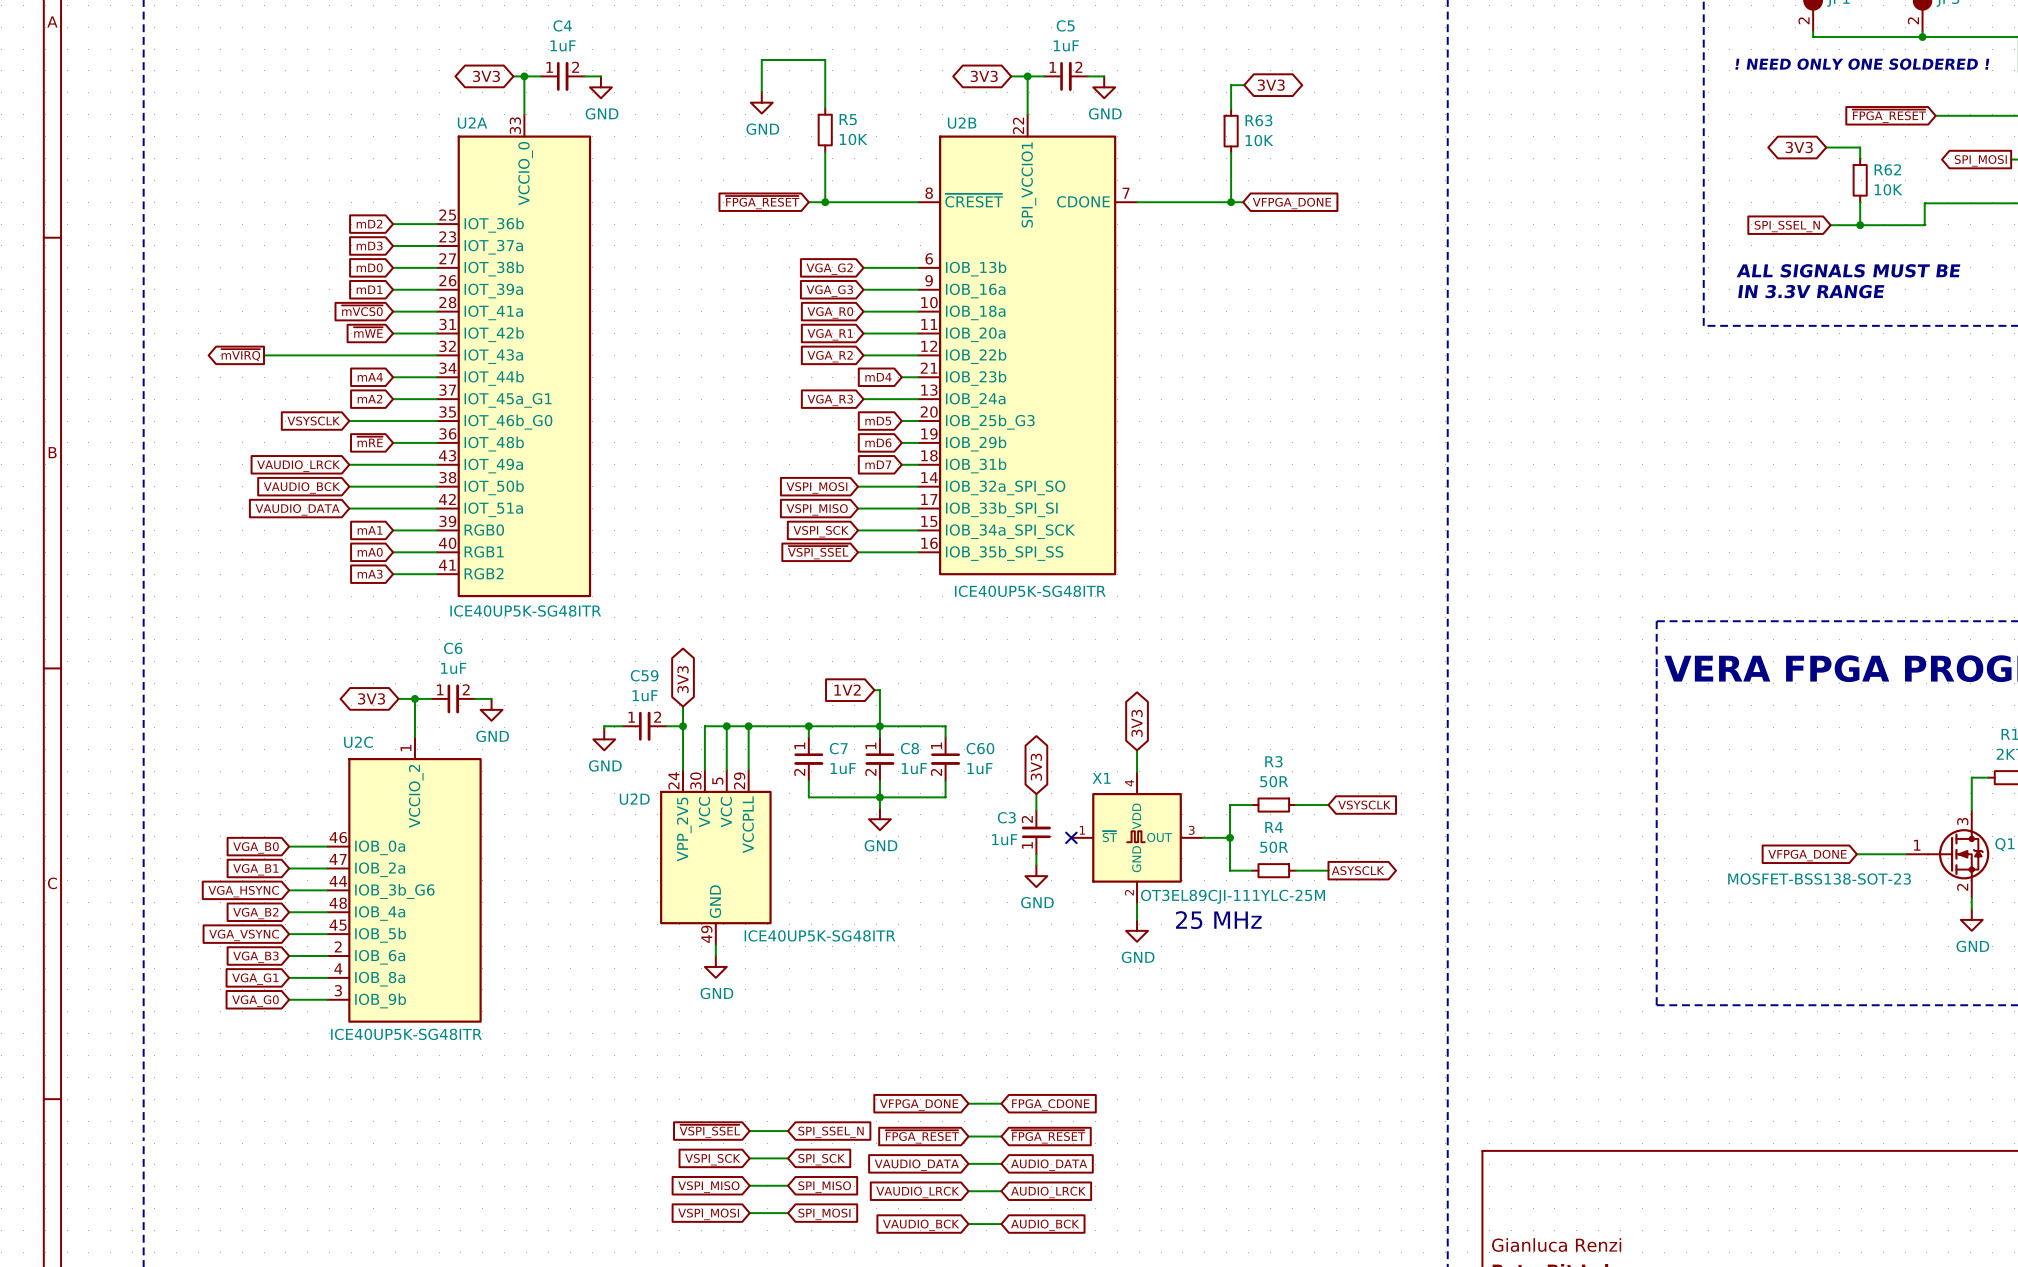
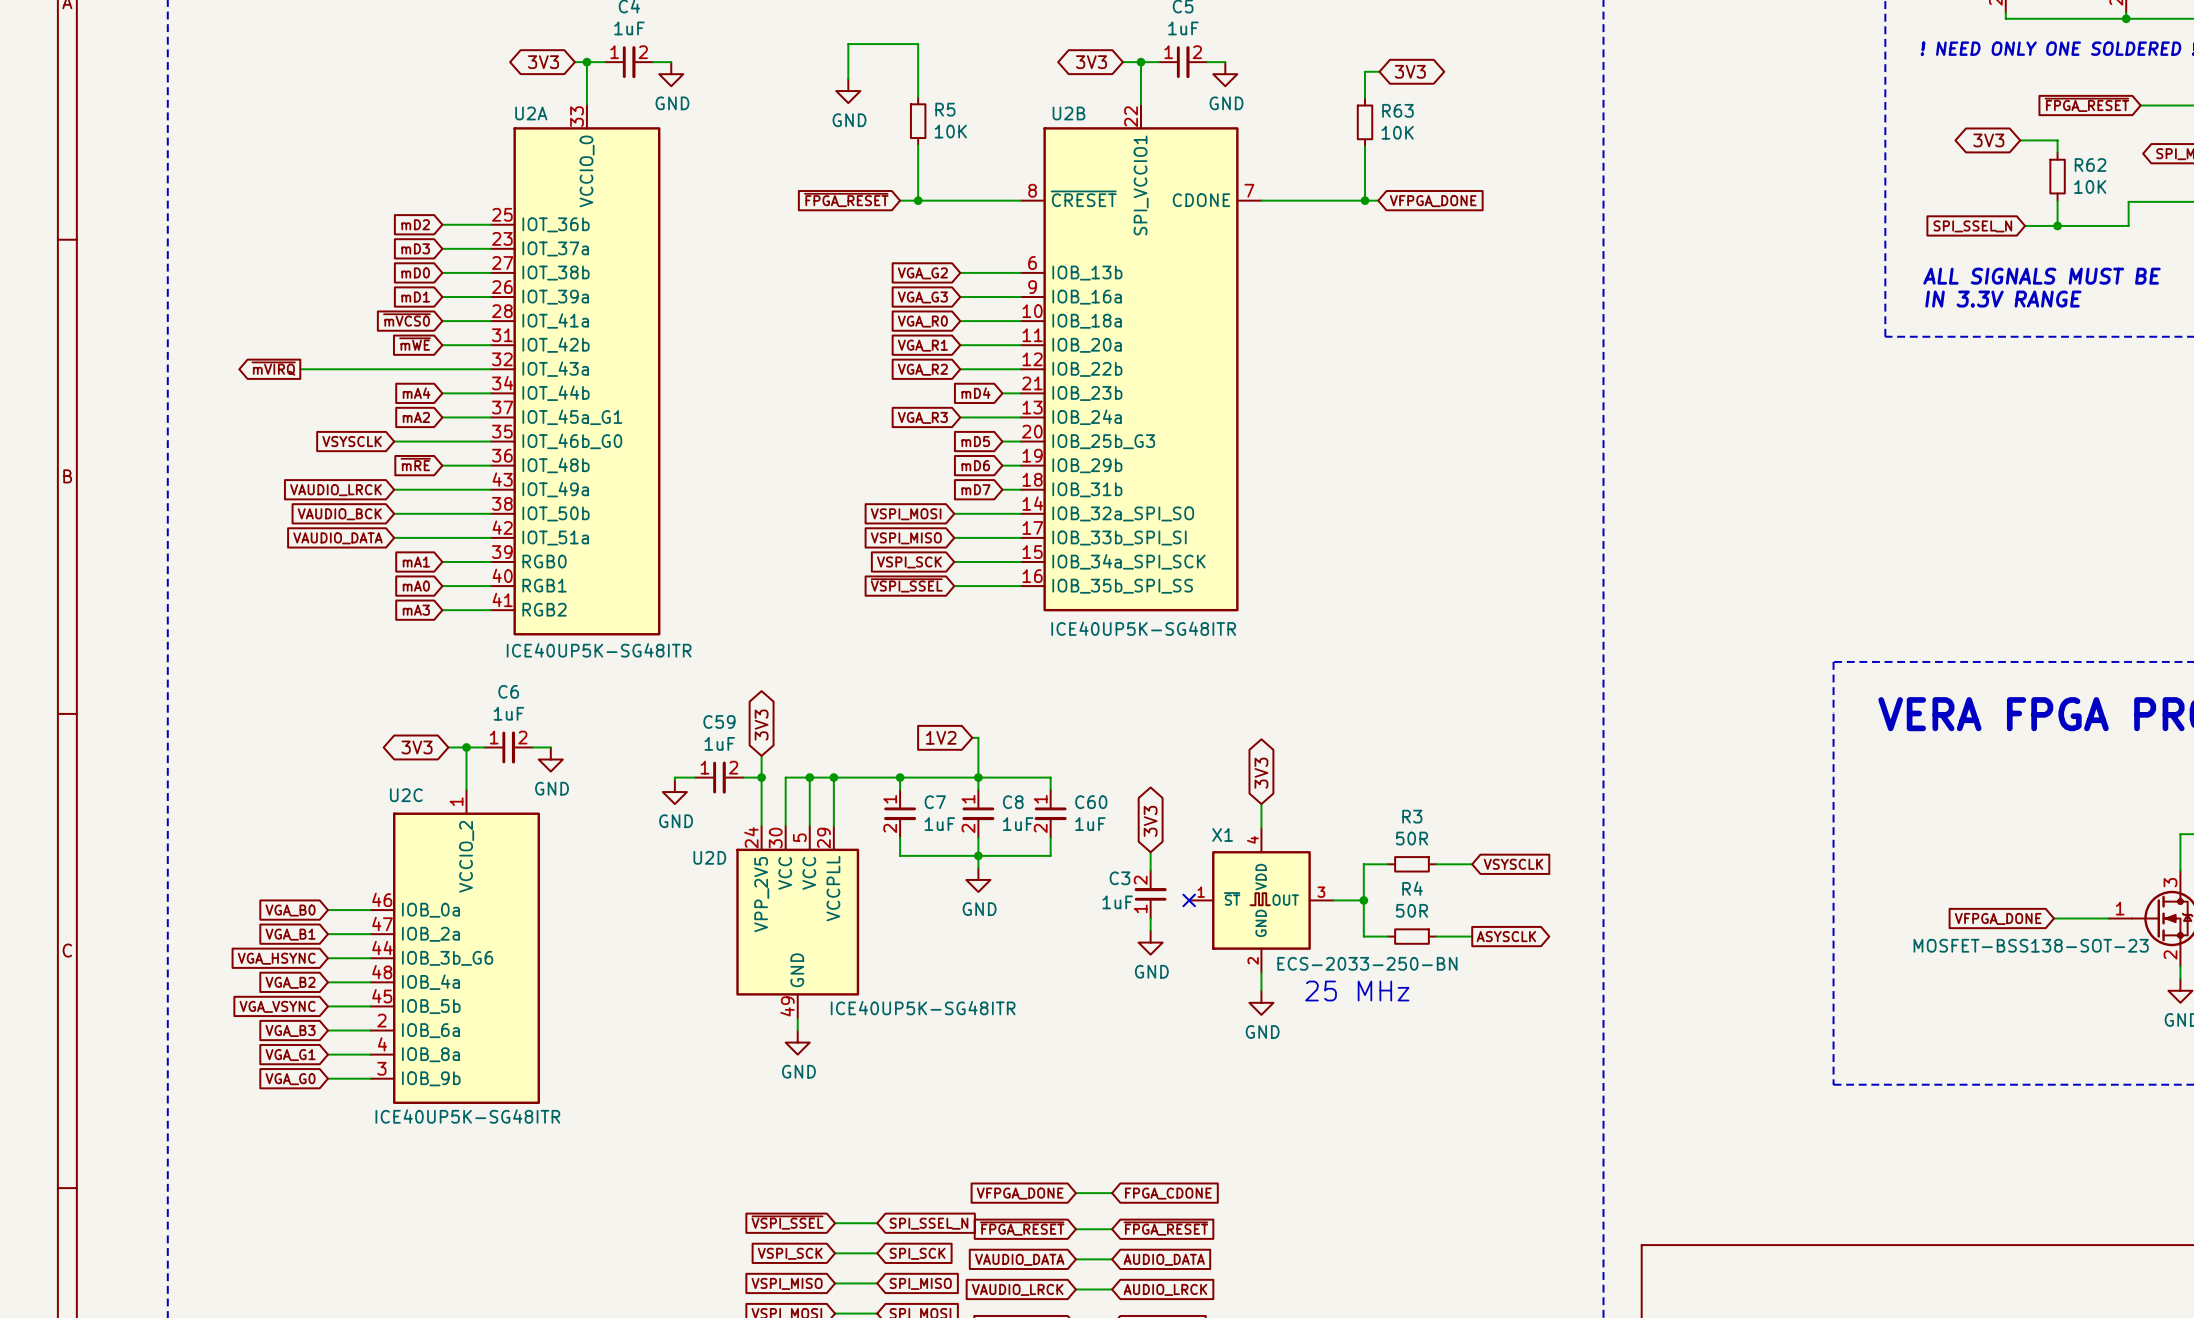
X1 value: OT3EL89CJI-111YLC-25M (1232, 896) -> ECS-2033-250-BN (1367, 963)

